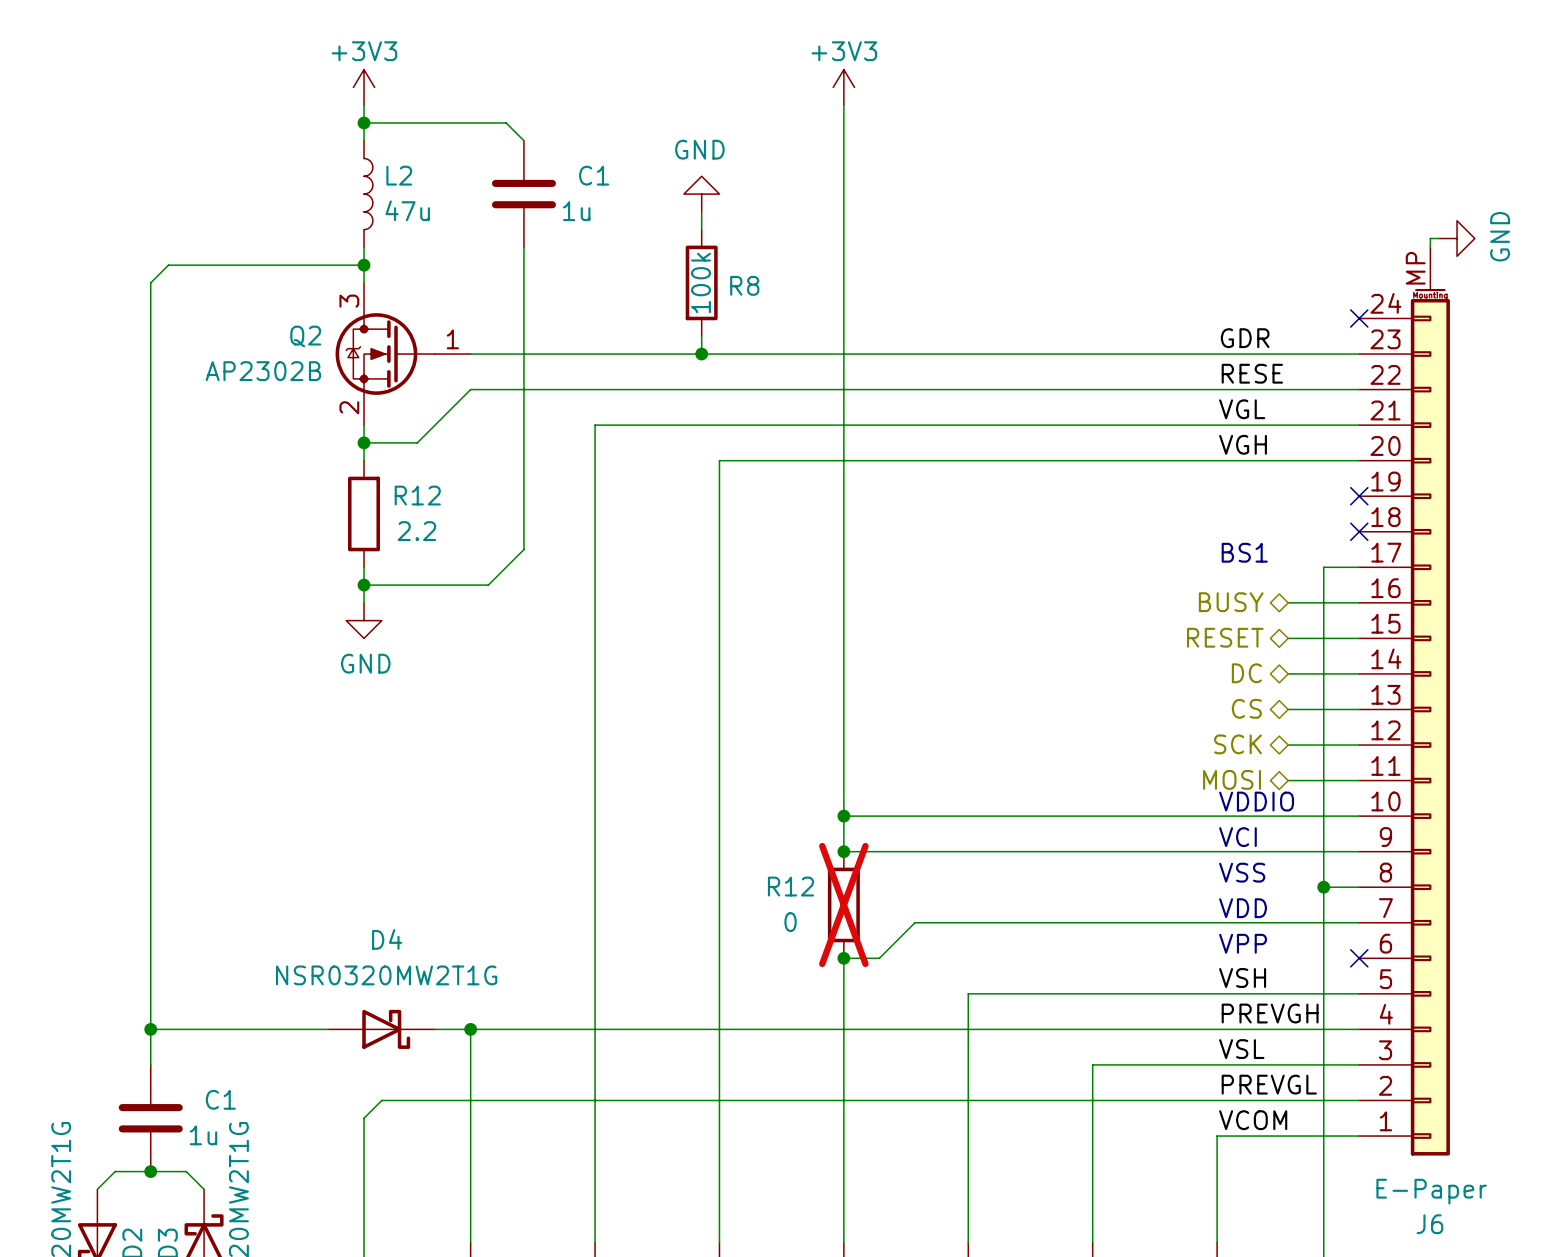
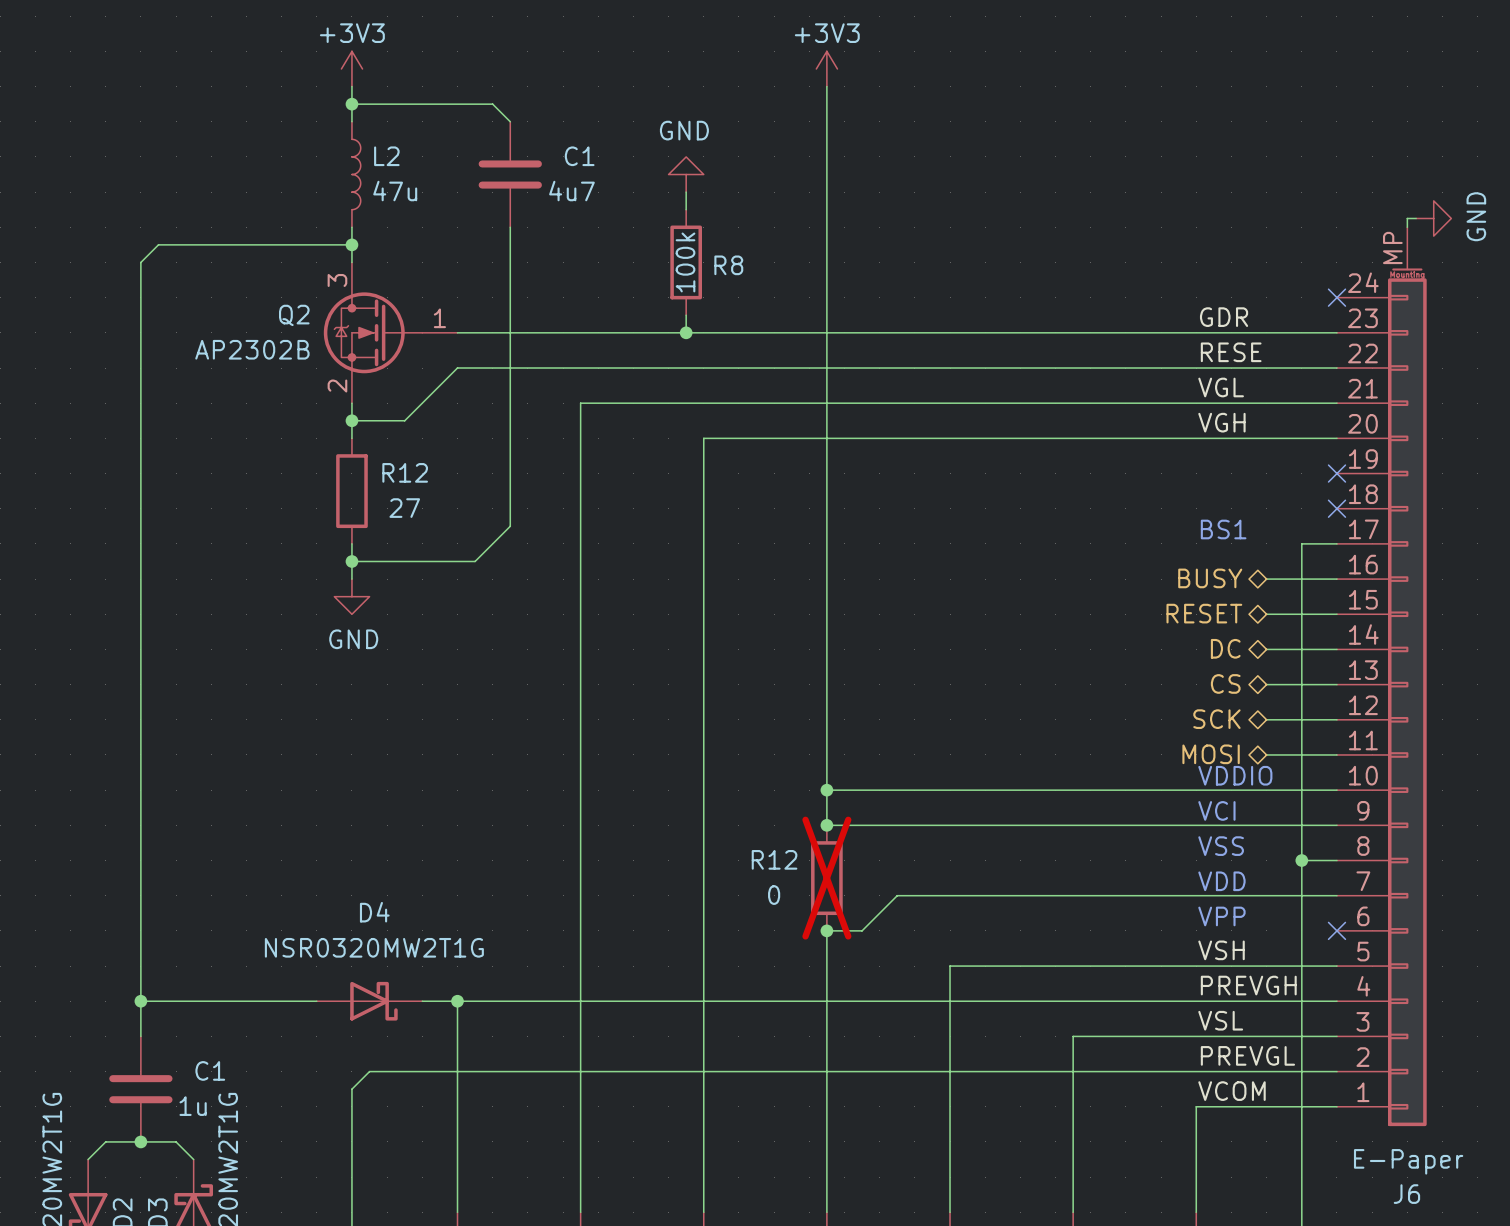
C1 value: 1u (576, 211) -> 4u7 (571, 191)
R12 value: 2.2 (416, 531) -> 27 (404, 508)

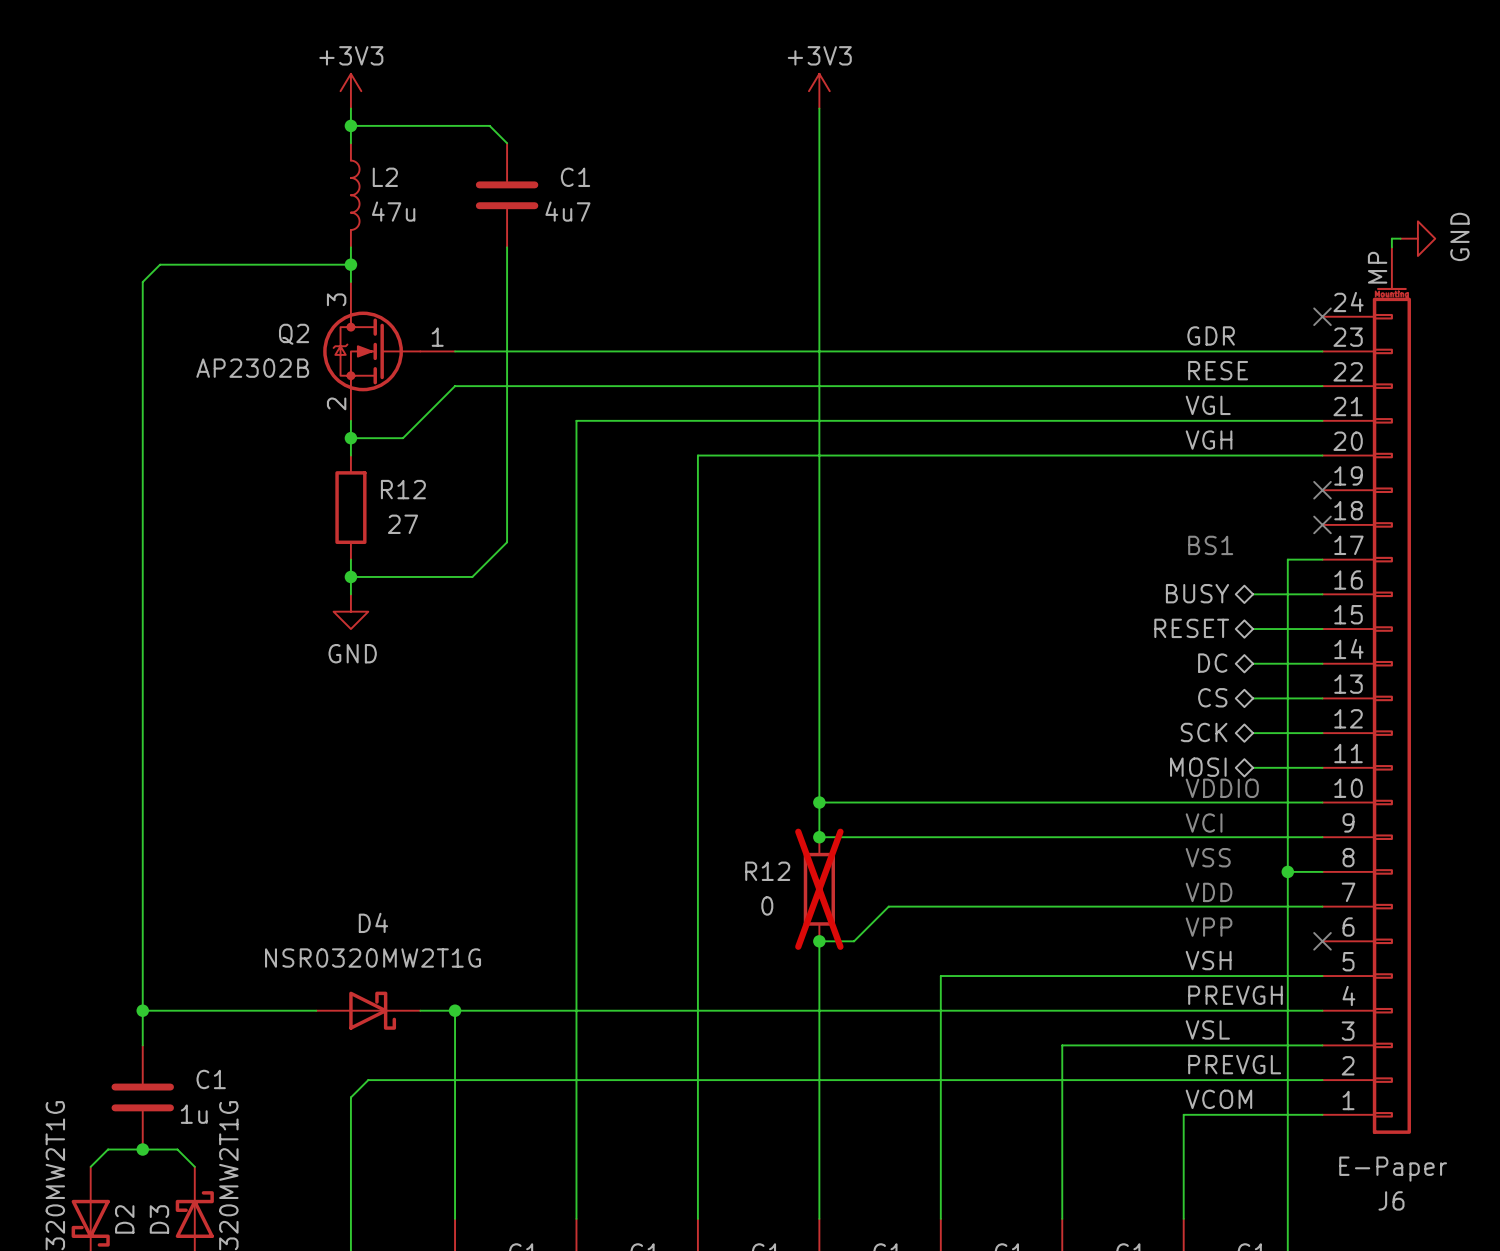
power symbol: GND (686, 174) -> none
wire: (686, 192) (686, 209) -> none
R8: 100k (686, 262) -> none
wire: (686, 315) (686, 332) -> none
junction: (686, 332) -> none

